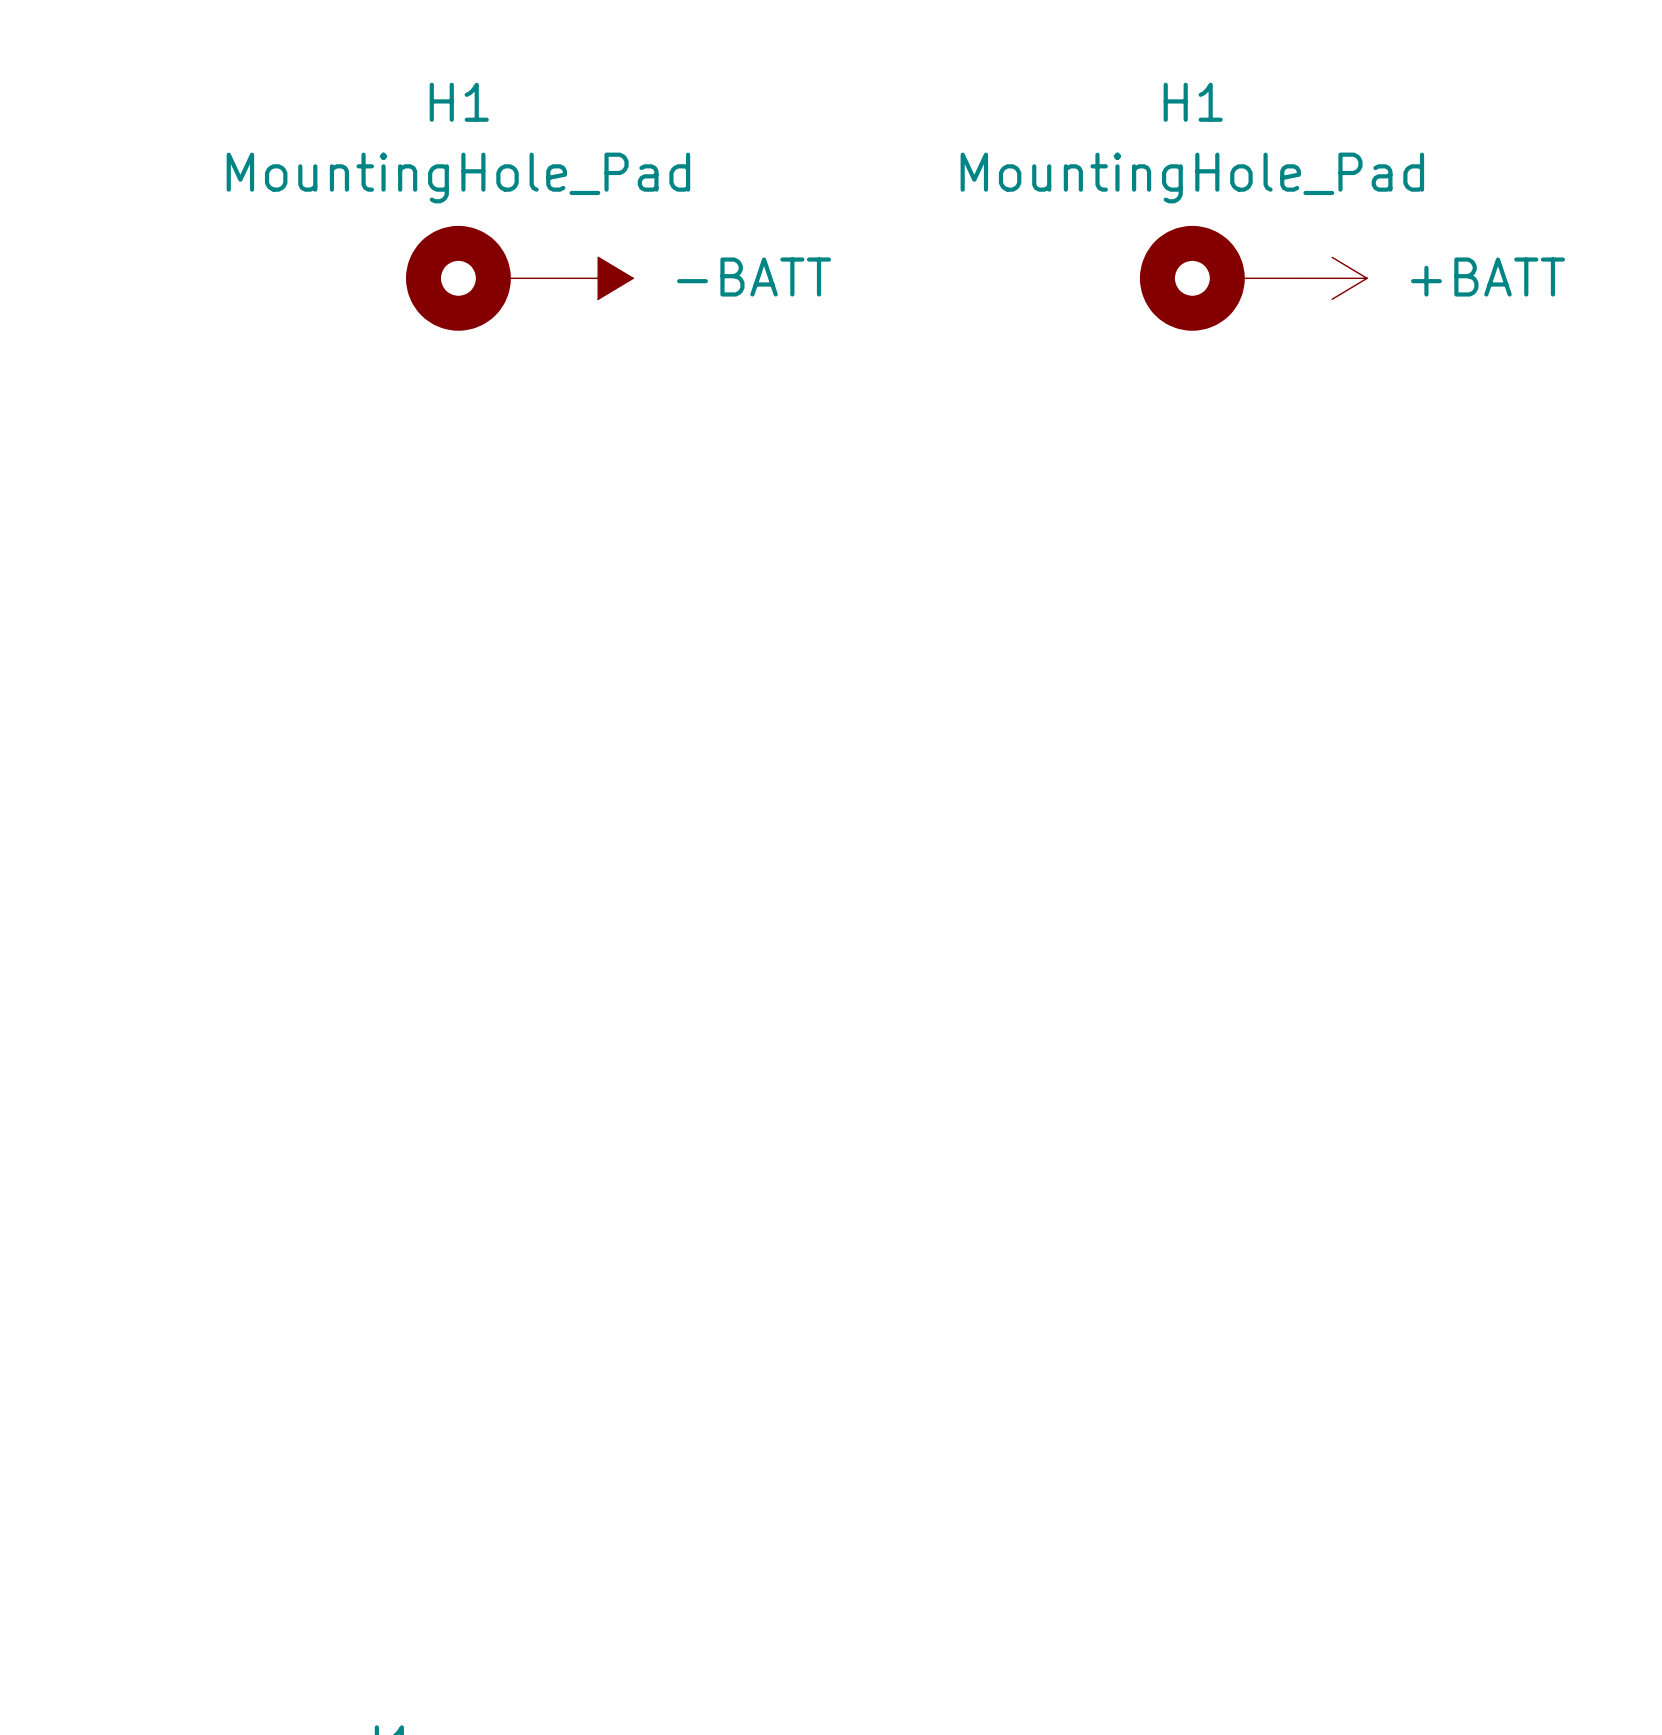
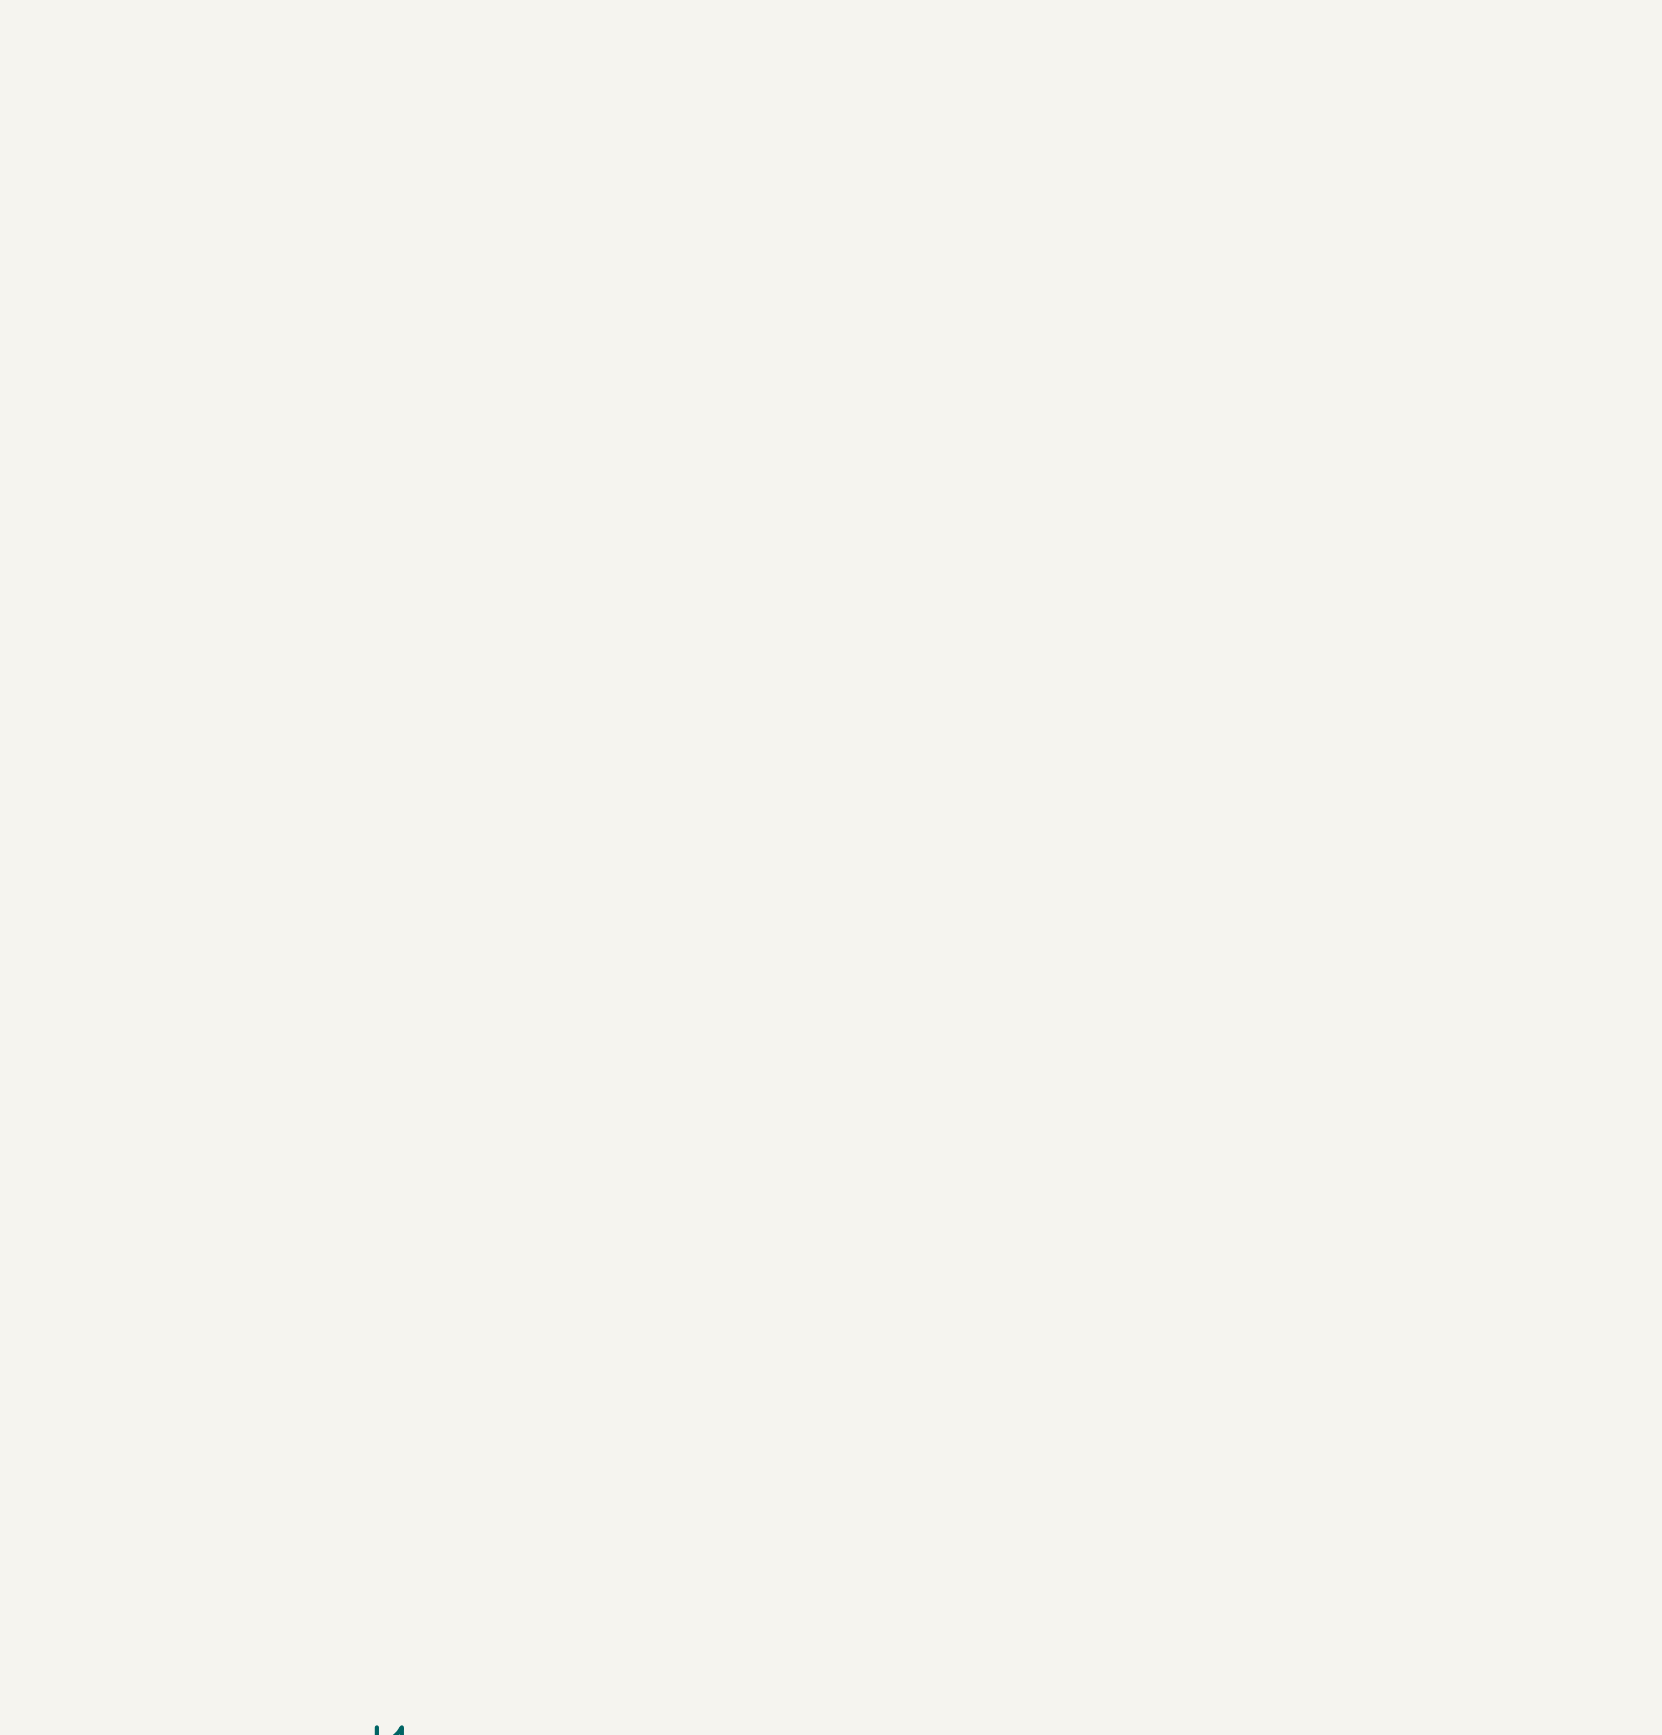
H1: MountingHole_Pad (484, 278) -> none
power symbol: -BATT (598, 278) -> none
H1: MountingHole_Pad (1218, 278) -> none
power symbol: +BATT (1332, 278) -> none

